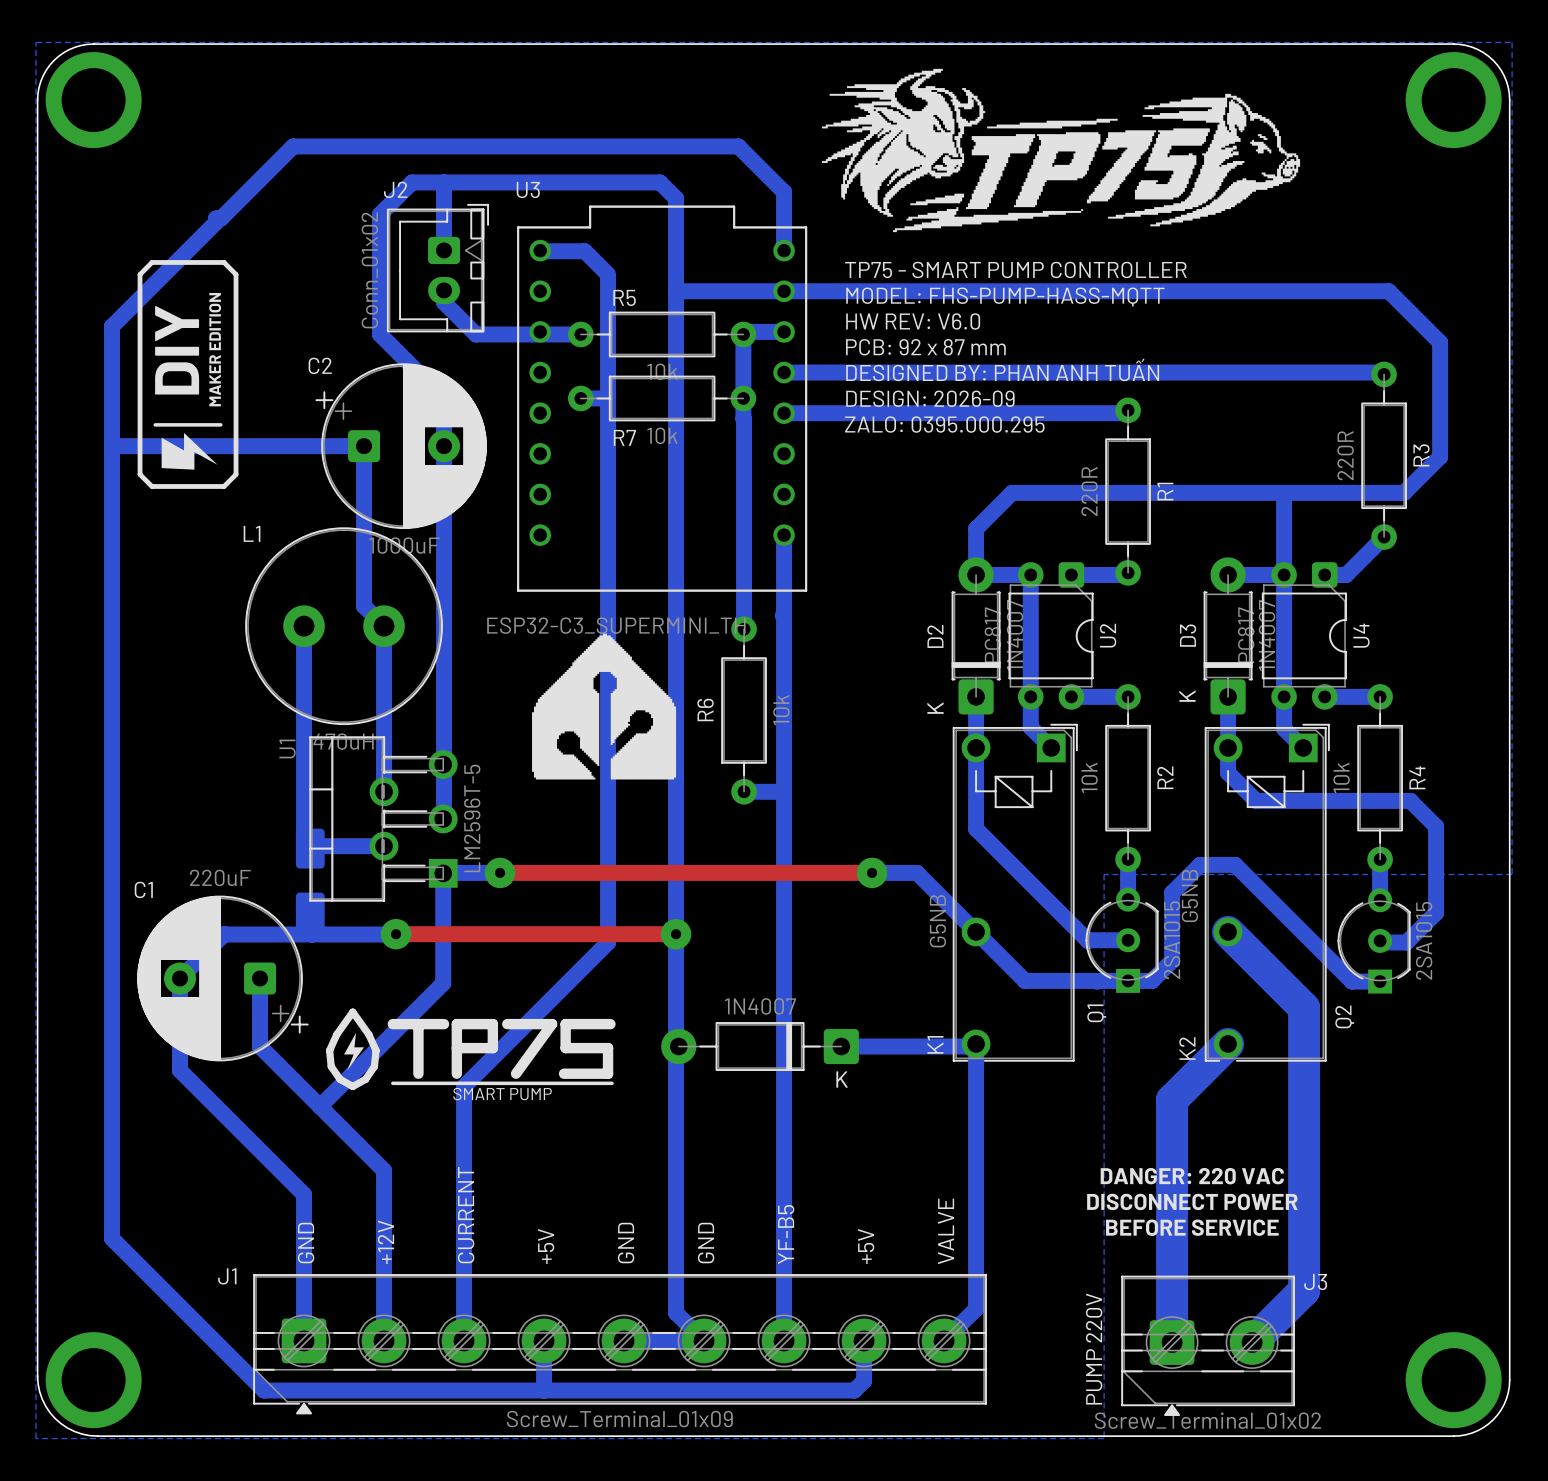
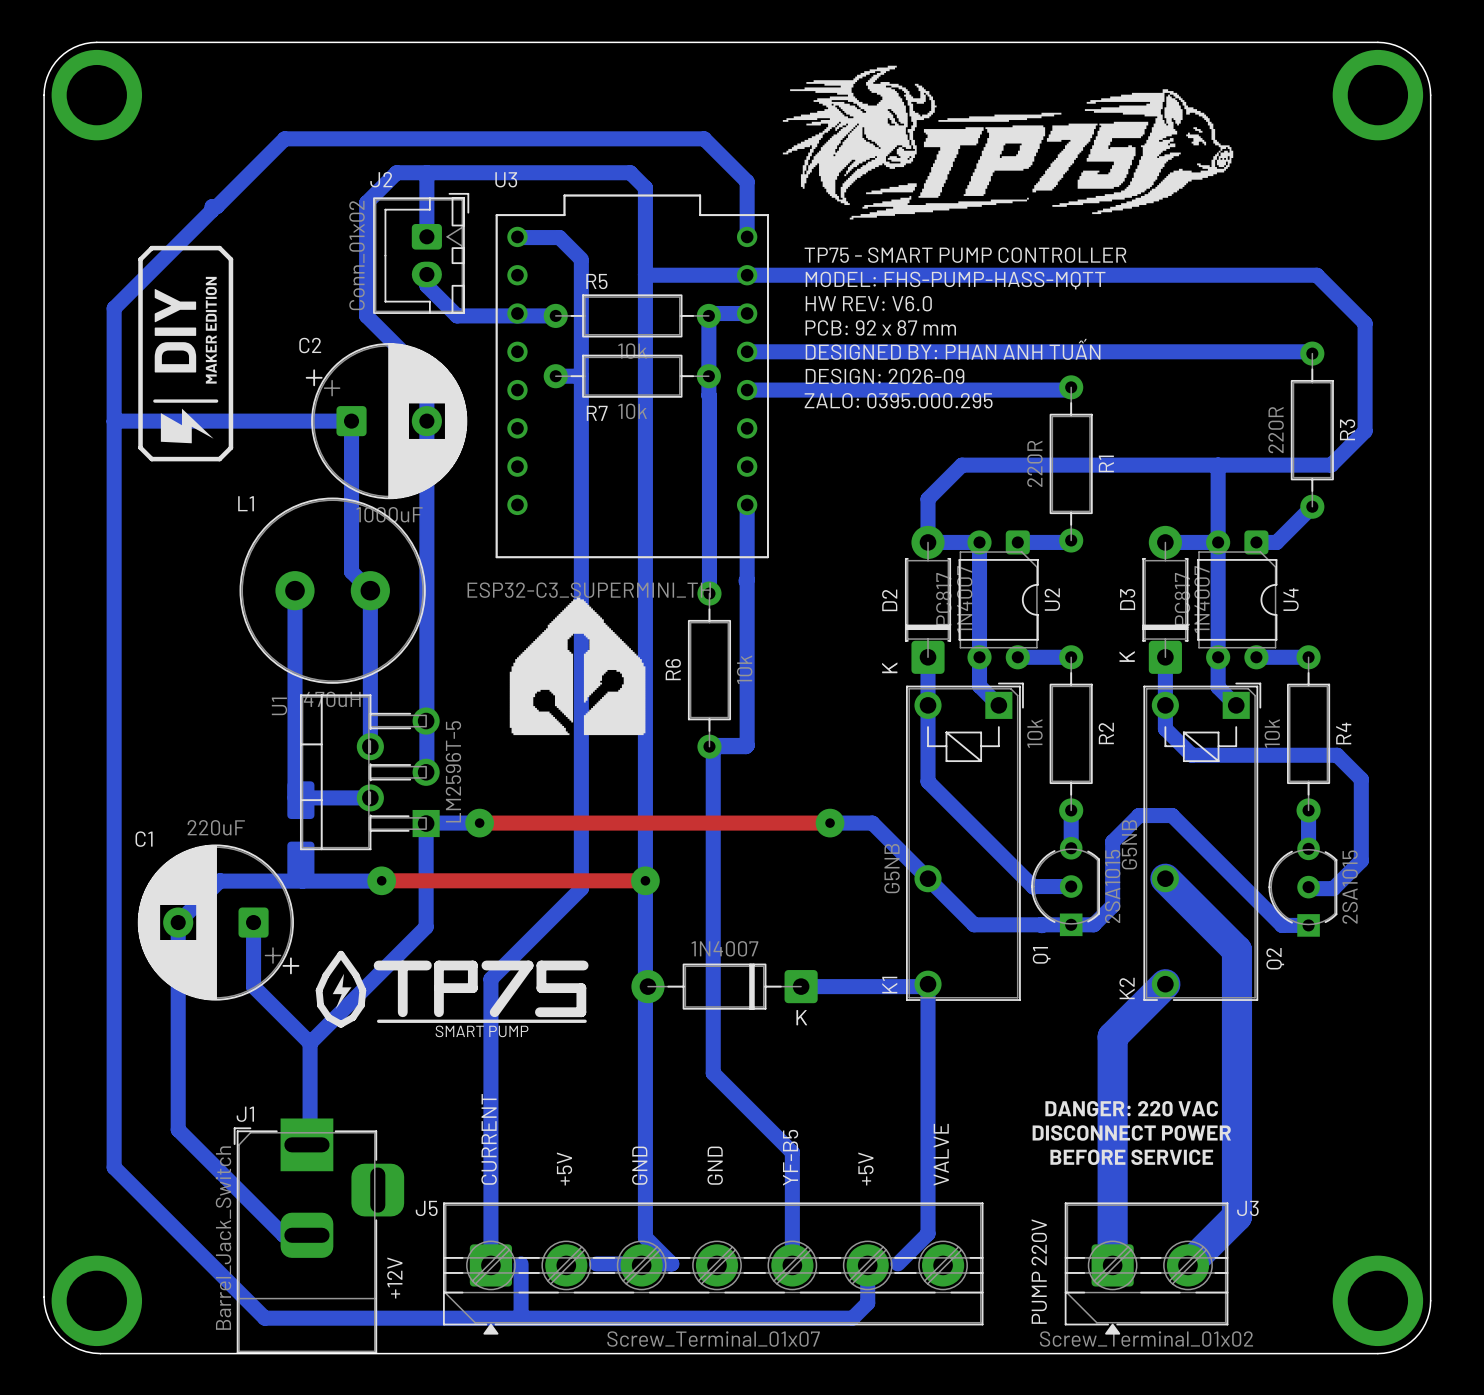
bottom zone outline: (36, 42) (36, 1438) (1104, 1438) (1104, 874) (1512, 874) (1512, 42) (36, 42) -> none
bottom track: (784, 790) (784, 1340) -> (747, 745) (713, 745) (713, 1073) (792, 1152) (792, 1265)
bottom track: (512, 1038) (464, 1086) (464, 1340) -> (490, 979) (490, 1265)
bottom track: (180, 1070) (304, 1194) (304, 1340) -> (178, 1009) (178, 1129) (283, 1235) (306, 1235)
bottom track: (320, 1106) (384, 1170) (384, 1340) -> (310, 1043) (310, 1141) (306, 1144)
text position: CURRENT (466, 1215) -> CURRENT (489, 1139)
text position: VALVE (946, 1231) -> VALVE (941, 1154)
text position: YF-B5 (786, 1234) -> YF-B5 (790, 1157)
text: none -> GND (639, 1165)
text: none -> GND (715, 1165)
text position: +12V (385, 1242) -> +12V (394, 1278)
text: GND (306, 1243) -> none
text: GND (626, 1243) -> none
text: GND (706, 1243) -> none
text position: +5V (546, 1246) -> +5V (564, 1168)
text position: +5V (866, 1246) -> +5V (865, 1168)
J1 footprint: [253, 1274, 987, 1415] -> [233, 1118, 405, 1354]
J1 name position: J1 (227, 1276) -> J1 (245, 1114)
bottom track: (864, 1340) (864, 1380) (854, 1390) (264, 1390) -> (867, 1265) (867, 1303) (852, 1318) (264, 1318) (257, 1310)
J5: none -> Screw_Terminal_01x07 (713, 1268)
J1 value: Screw_Terminal_01x09 (619, 1419) -> Barrel_Jack_Switch (223, 1238)

